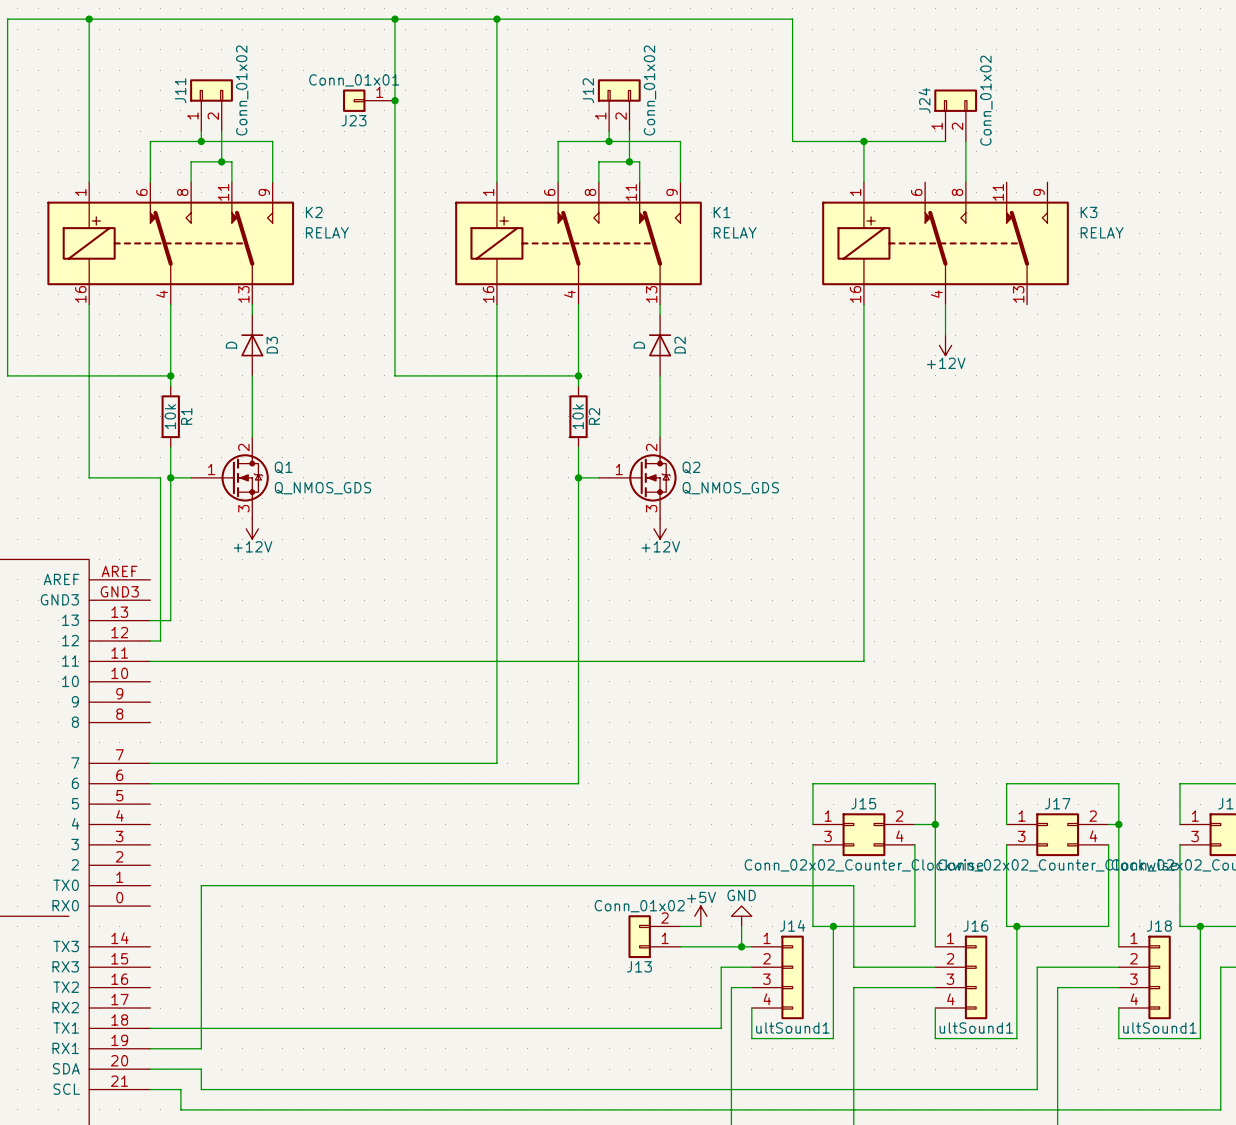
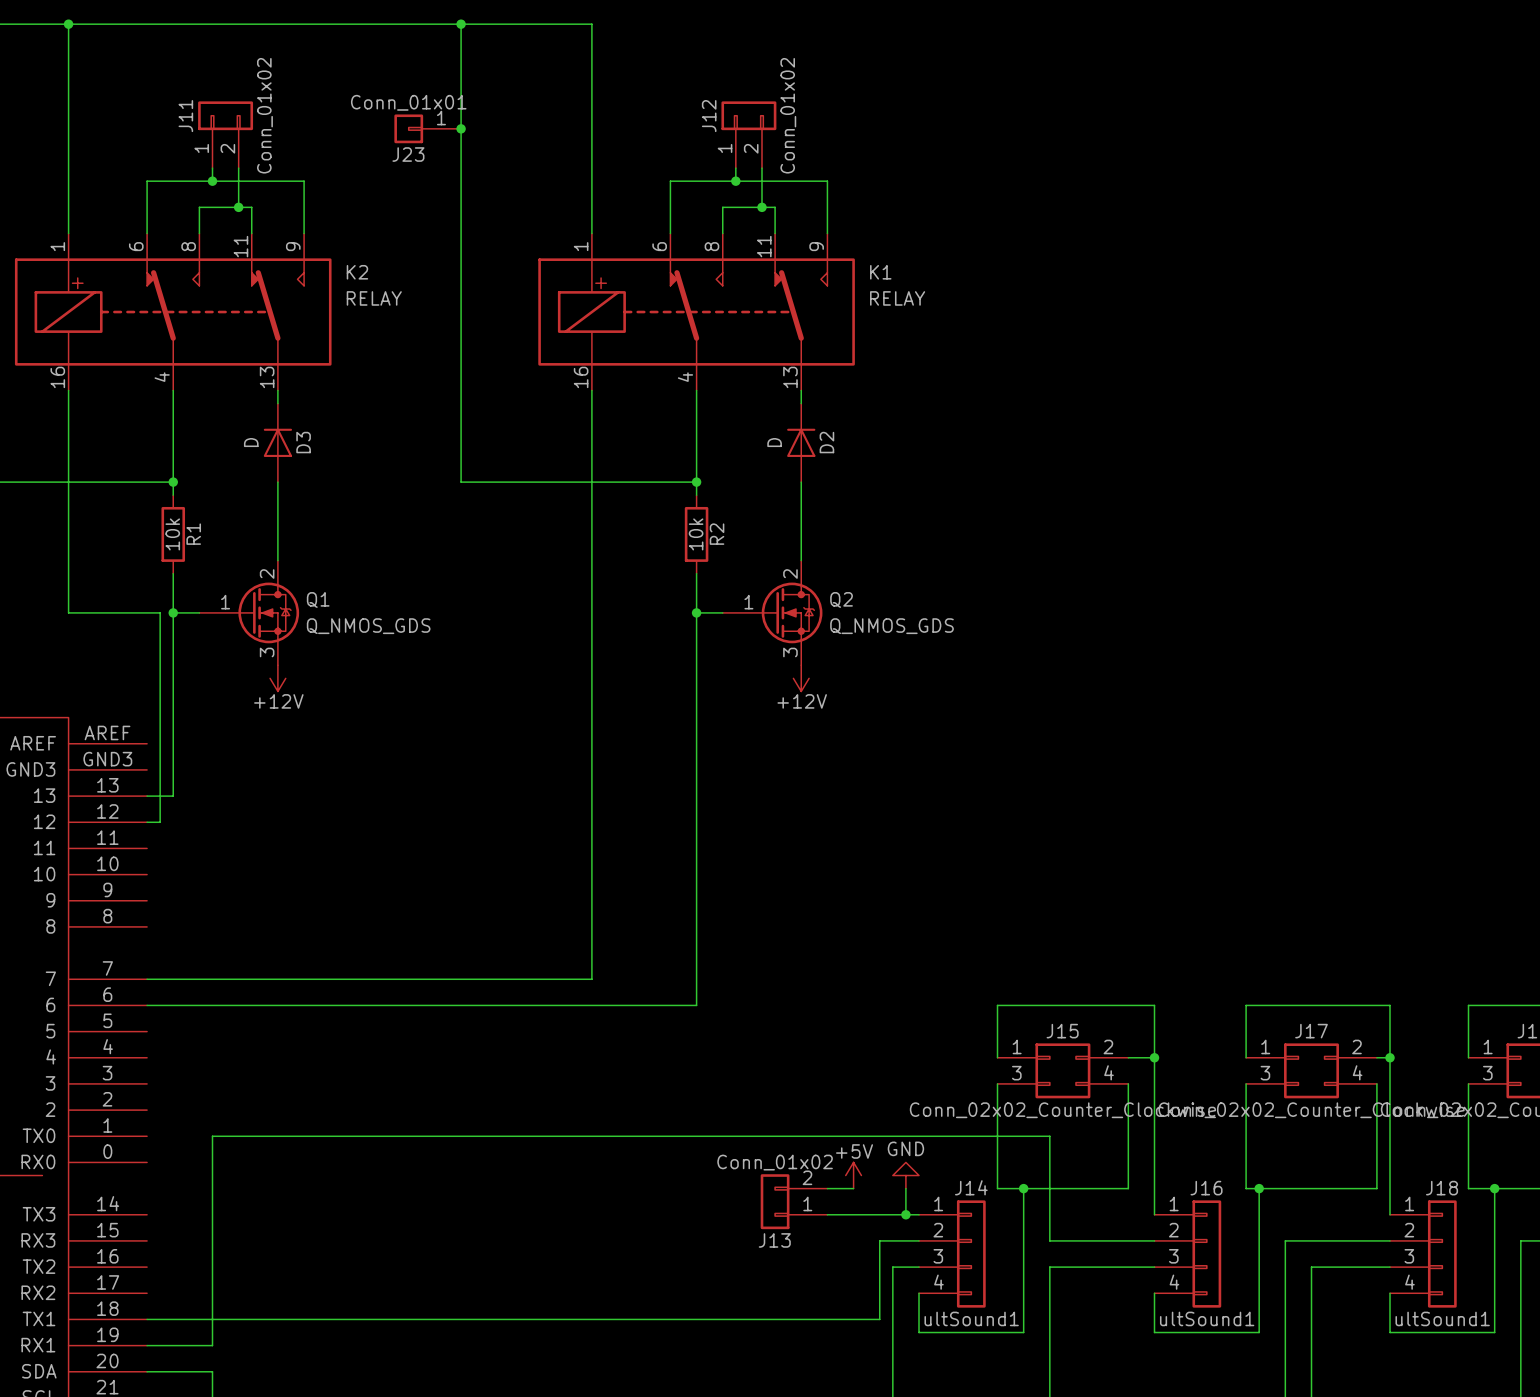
wire: (496, 19) (792, 19) (792, 141) (945, 141) -> none
junction: (496, 19) -> none
J24: Conn_01x02 (955, 115) -> none
wire: (863, 141) (863, 182) -> none
junction: (863, 141) -> none
wire: (965, 141) (965, 182) -> none
K3: RELAY (945, 243) -> none
wire: (863, 304) (863, 661) (150, 661) -> none
wire: (945, 304) (945, 335) -> none
power symbol: +12V (945, 345) -> none

